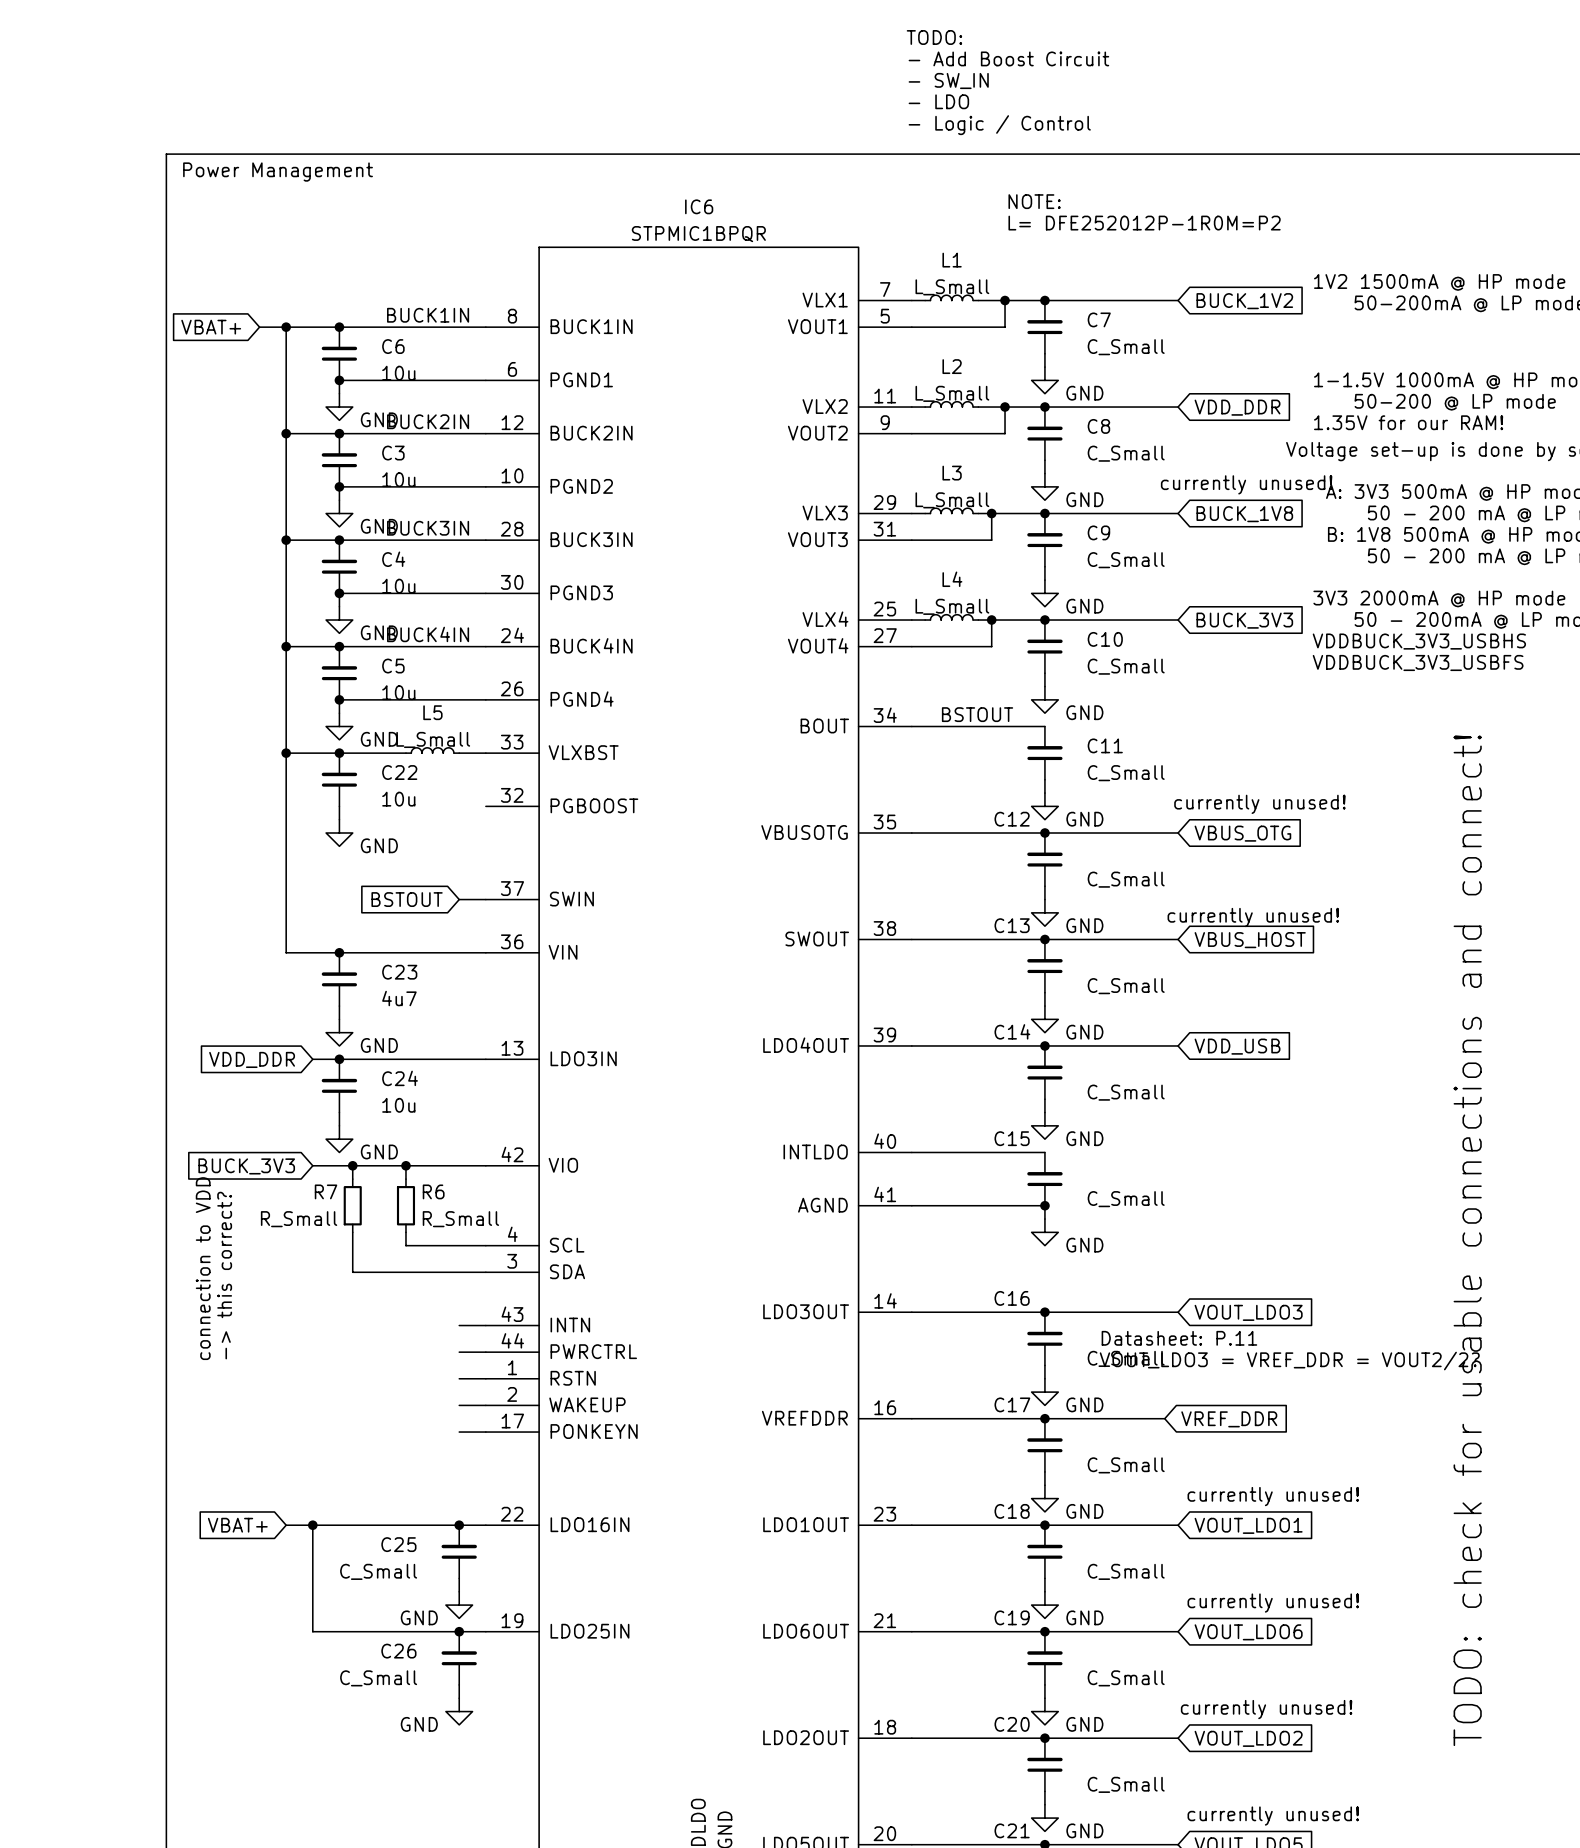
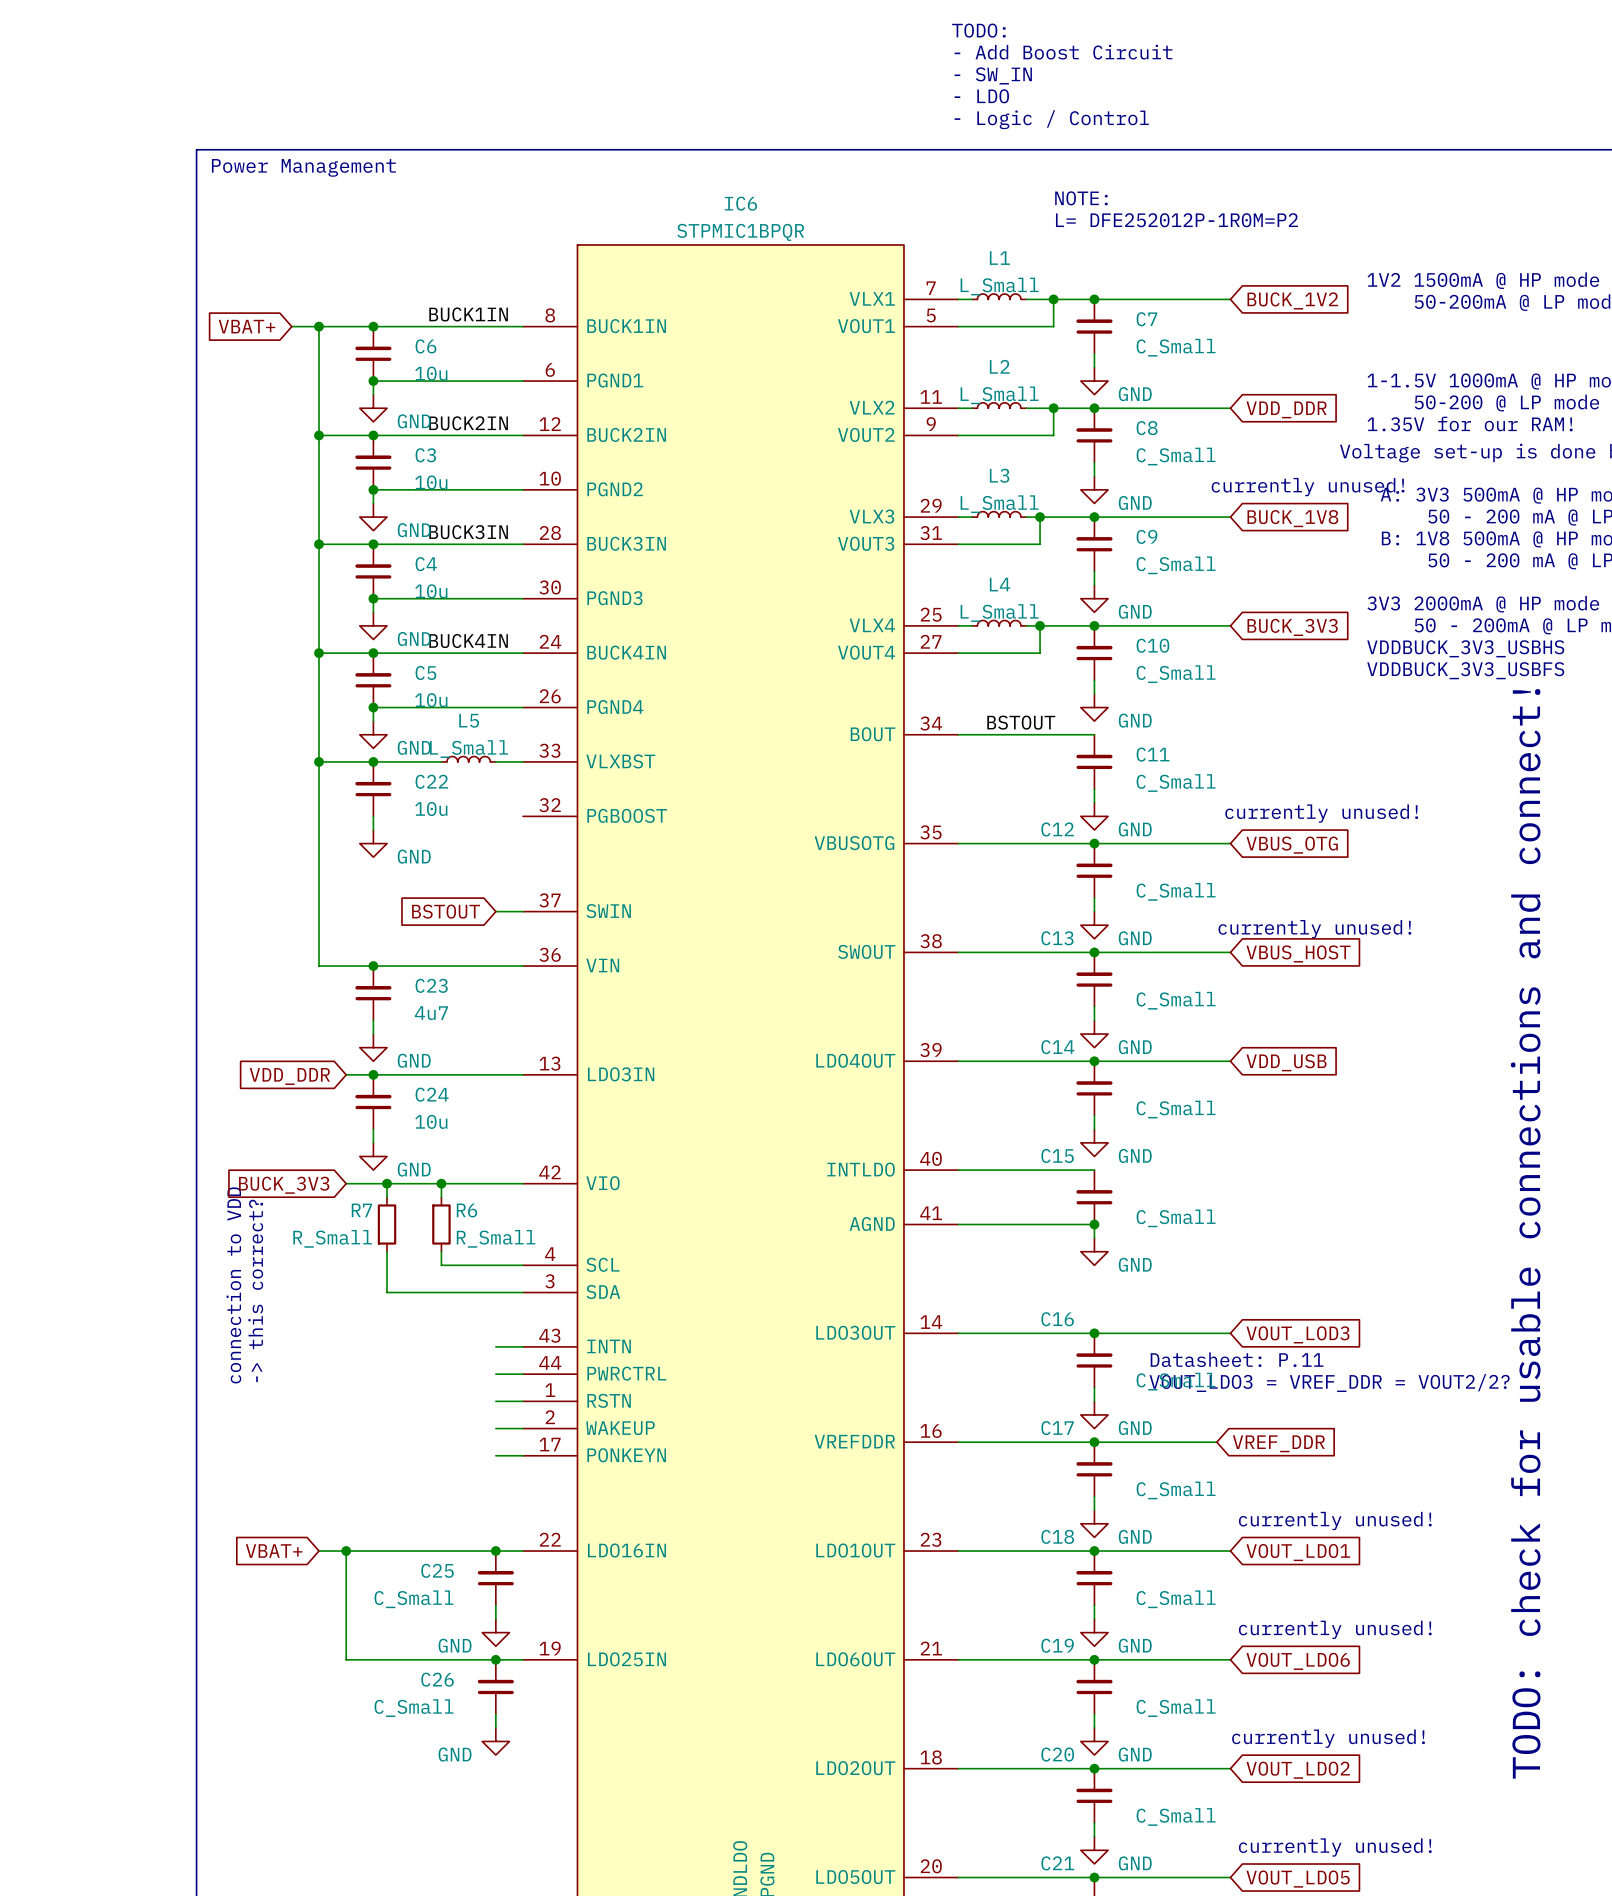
global label: VOUT_LDO3 (1248, 1312) -> VOUT_LOD3 (1297, 1334)

